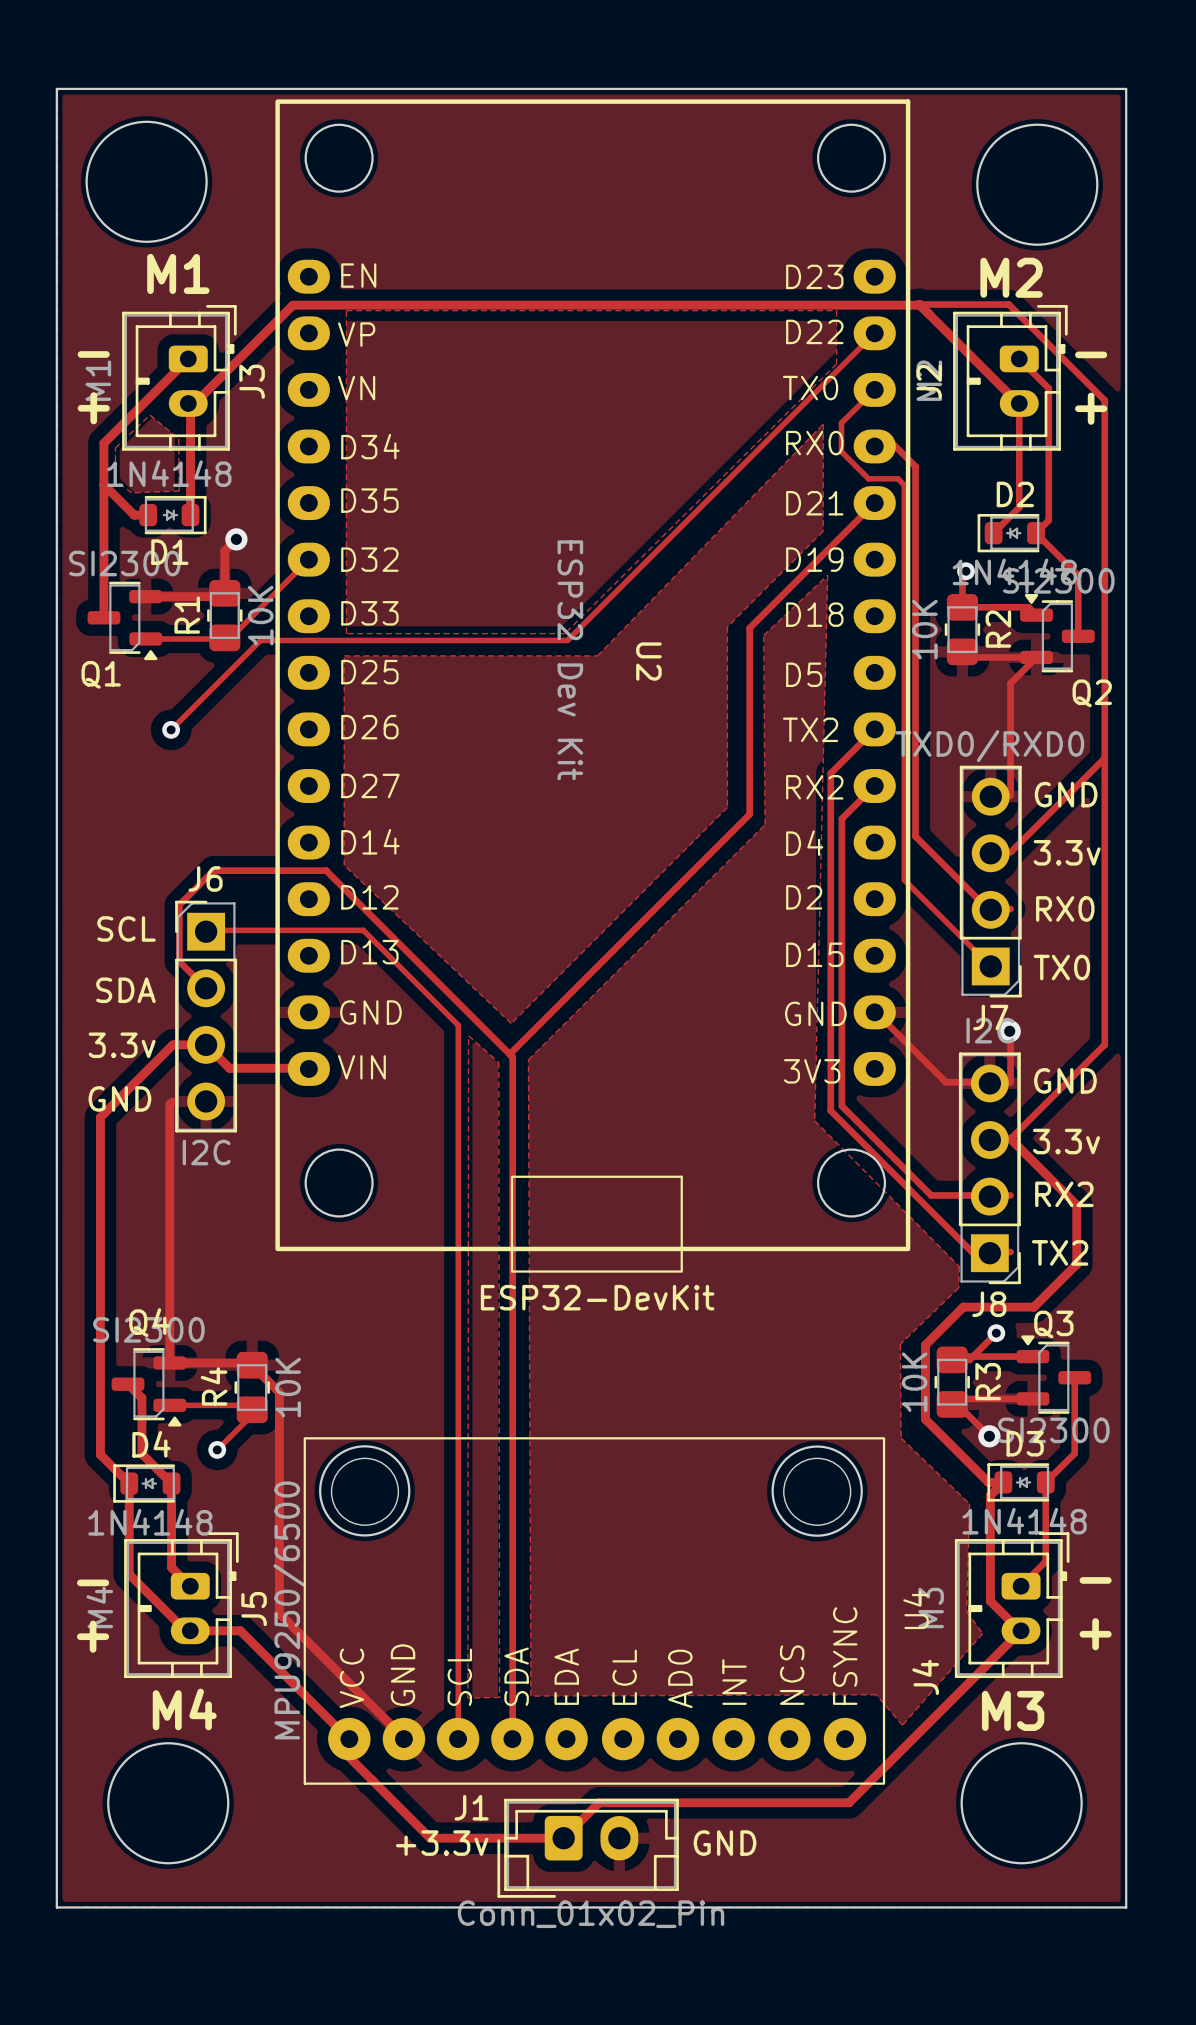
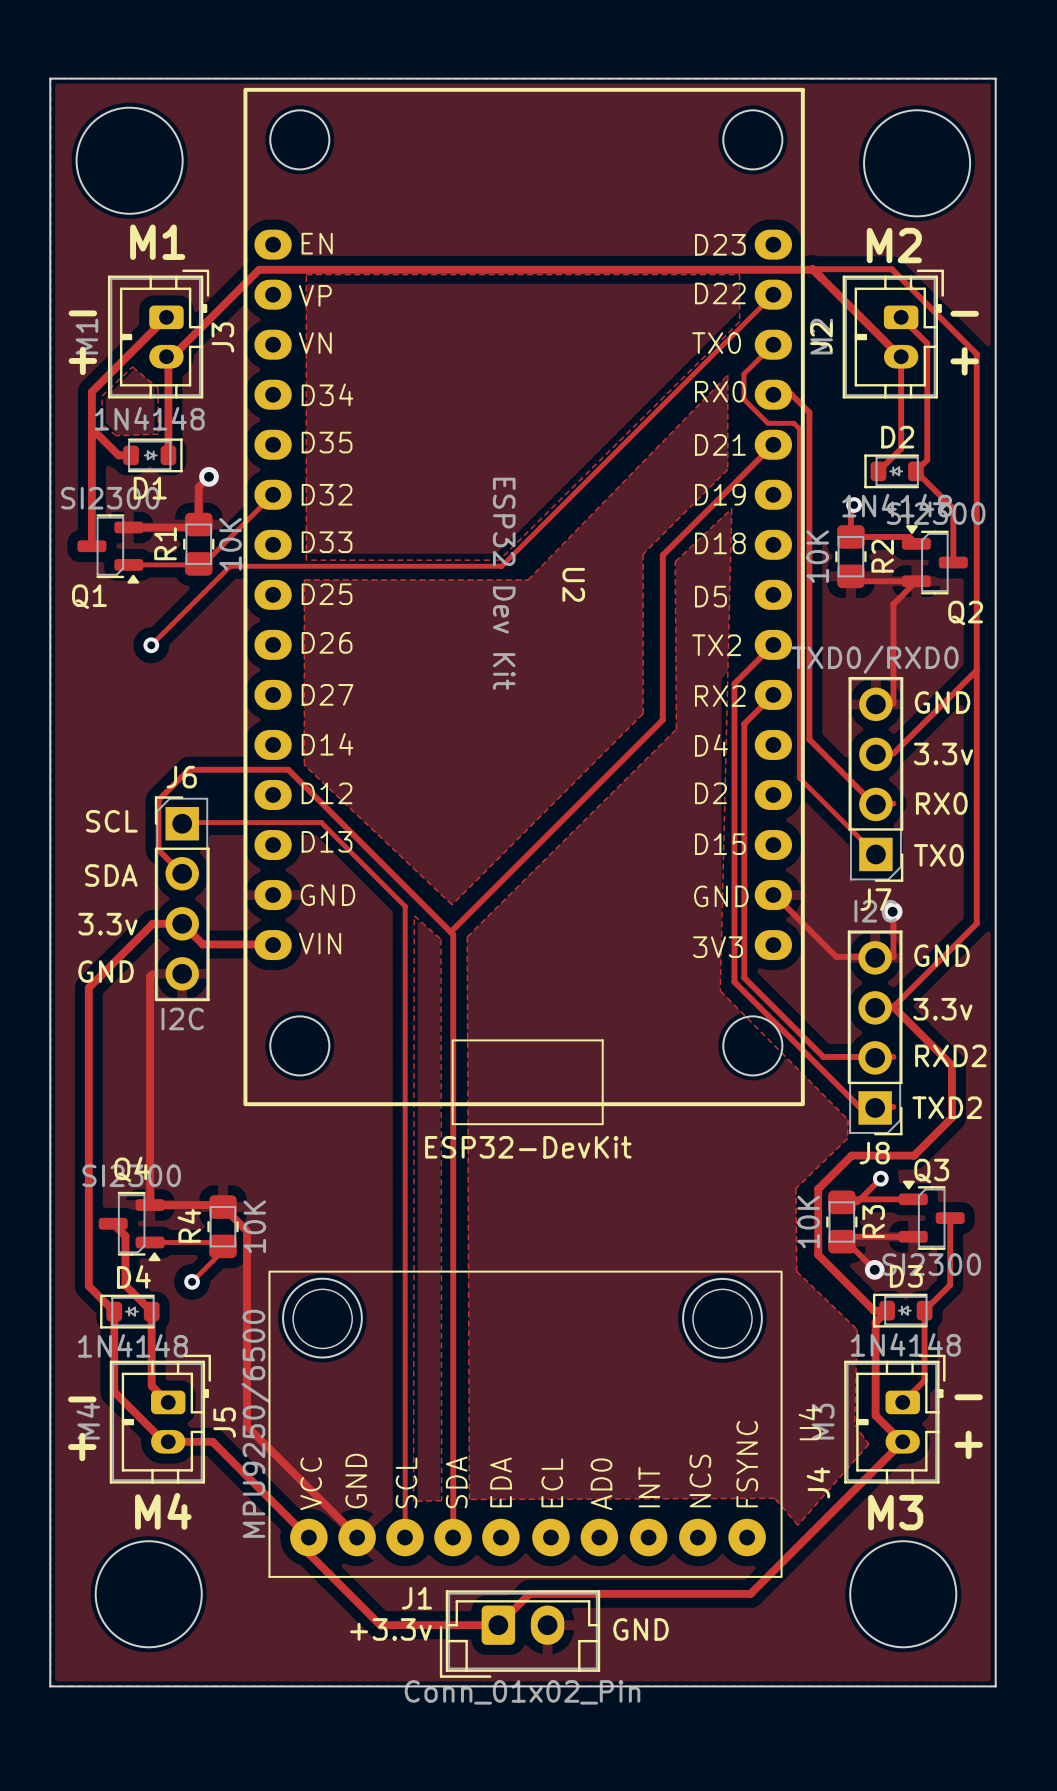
text: RX2 (1064, 1194) -> RXD2 (950, 1055)
text: TX2 (1060, 1252) -> TXD2 (947, 1107)

